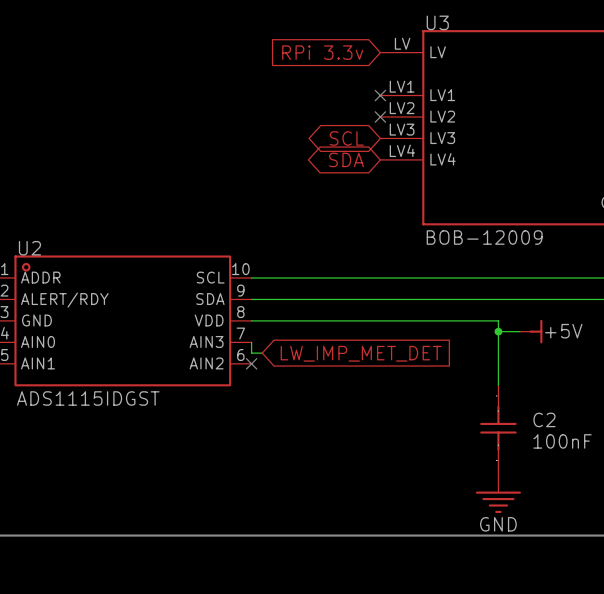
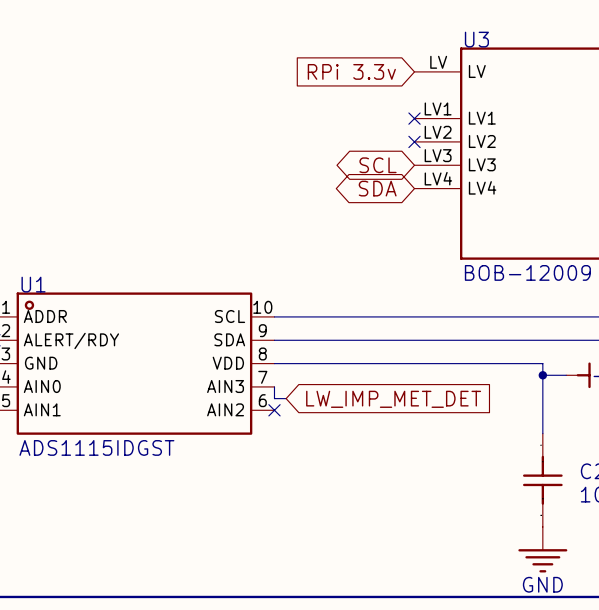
U2 name: U2 (29, 248) -> U1 (33, 284)

